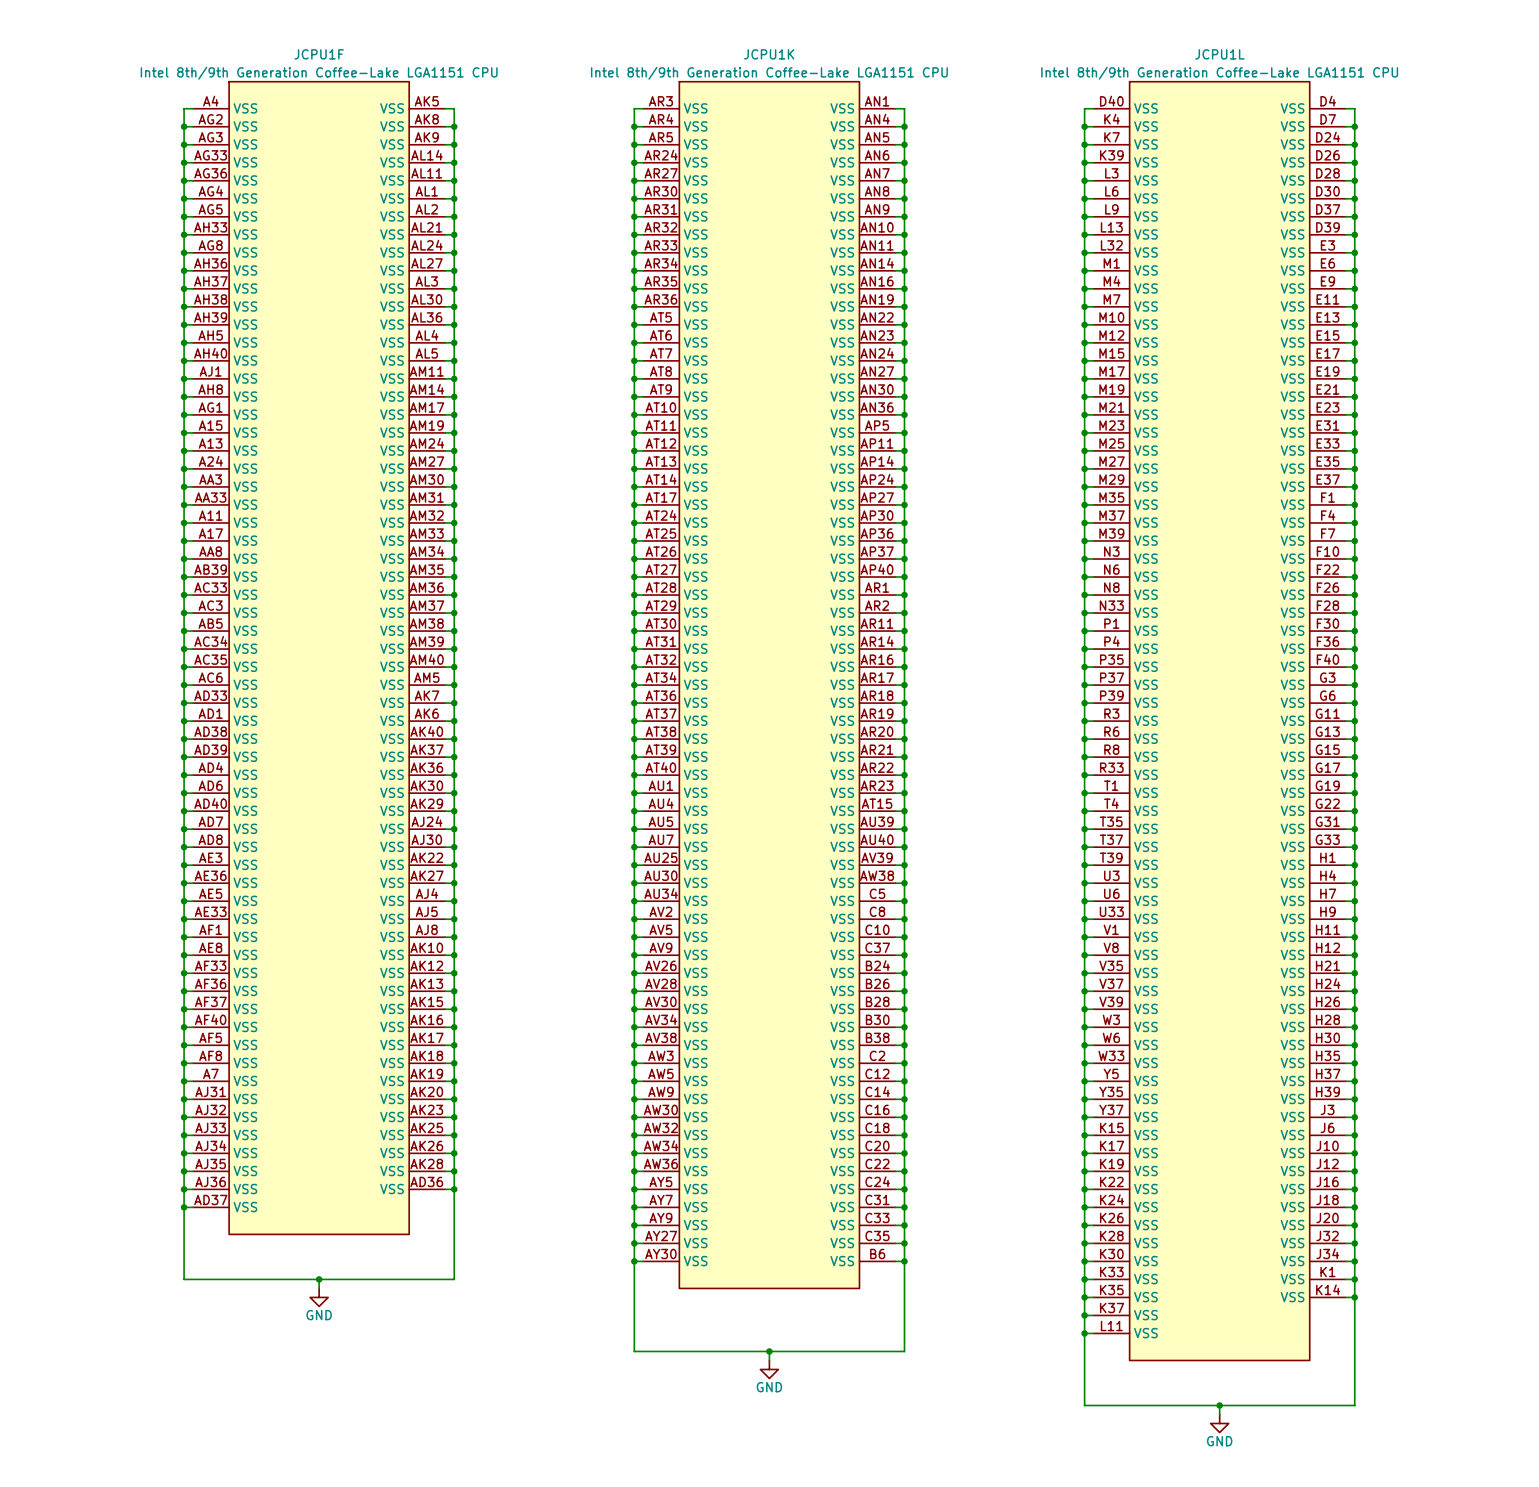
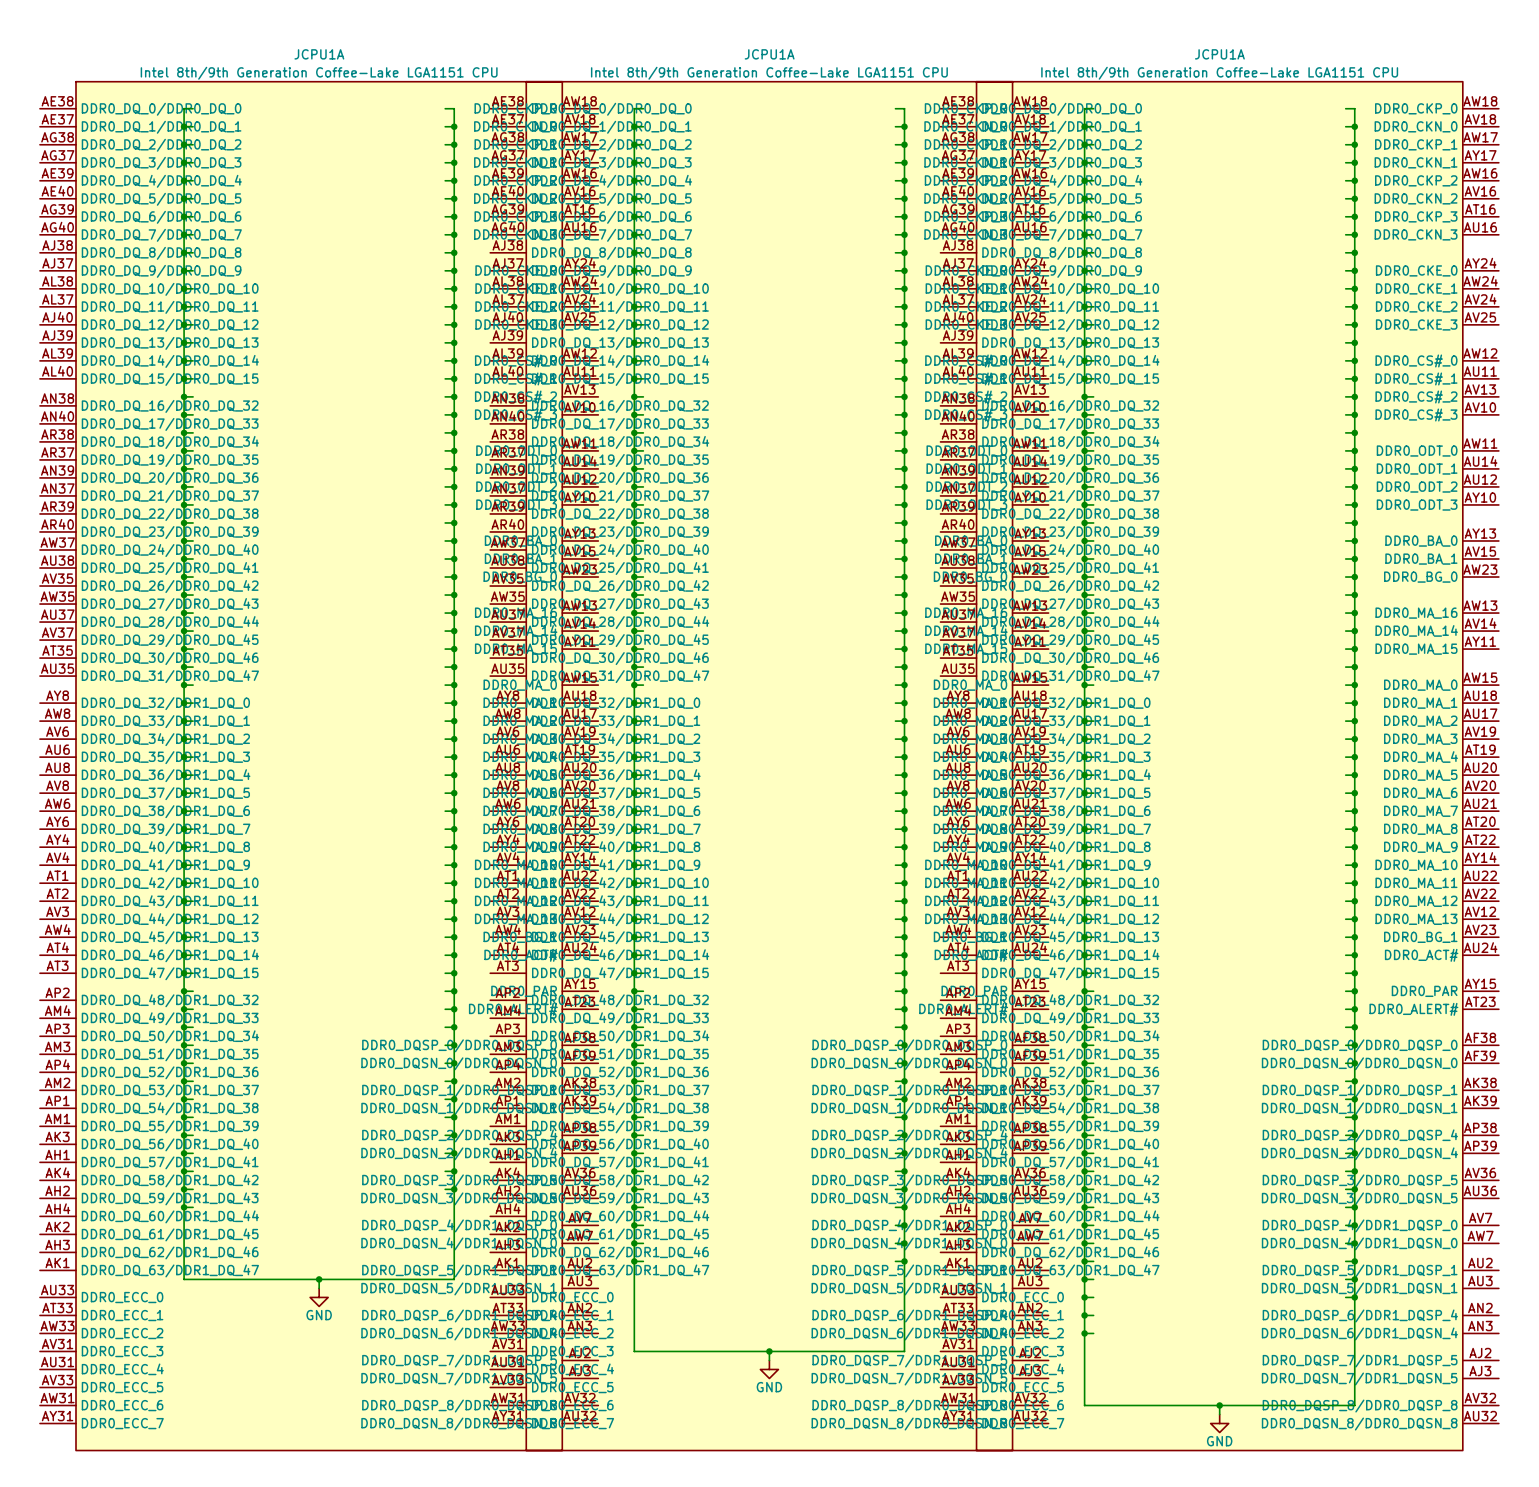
JCPU1F: Intel 8th/9th Generation Coffee-Lake LGA1151 CPU (319, 658) -> none
JCPU1K: Intel 8th/9th Generation Coffee-Lake LGA1151 CPU (769, 685) -> none
JCPU1L: Intel 8th/9th Generation Coffee-Lake LGA1151 CPU (1219, 721) -> none
JCPU1A: none -> Intel 8th/9th Generation Coffee-Lake LGA1151 CPU (319, 766)
JCPU1A: none -> Intel 8th/9th Generation Coffee-Lake LGA1151 CPU (769, 766)
JCPU1A: none -> Intel 8th/9th Generation Coffee-Lake LGA1151 CPU (1219, 766)

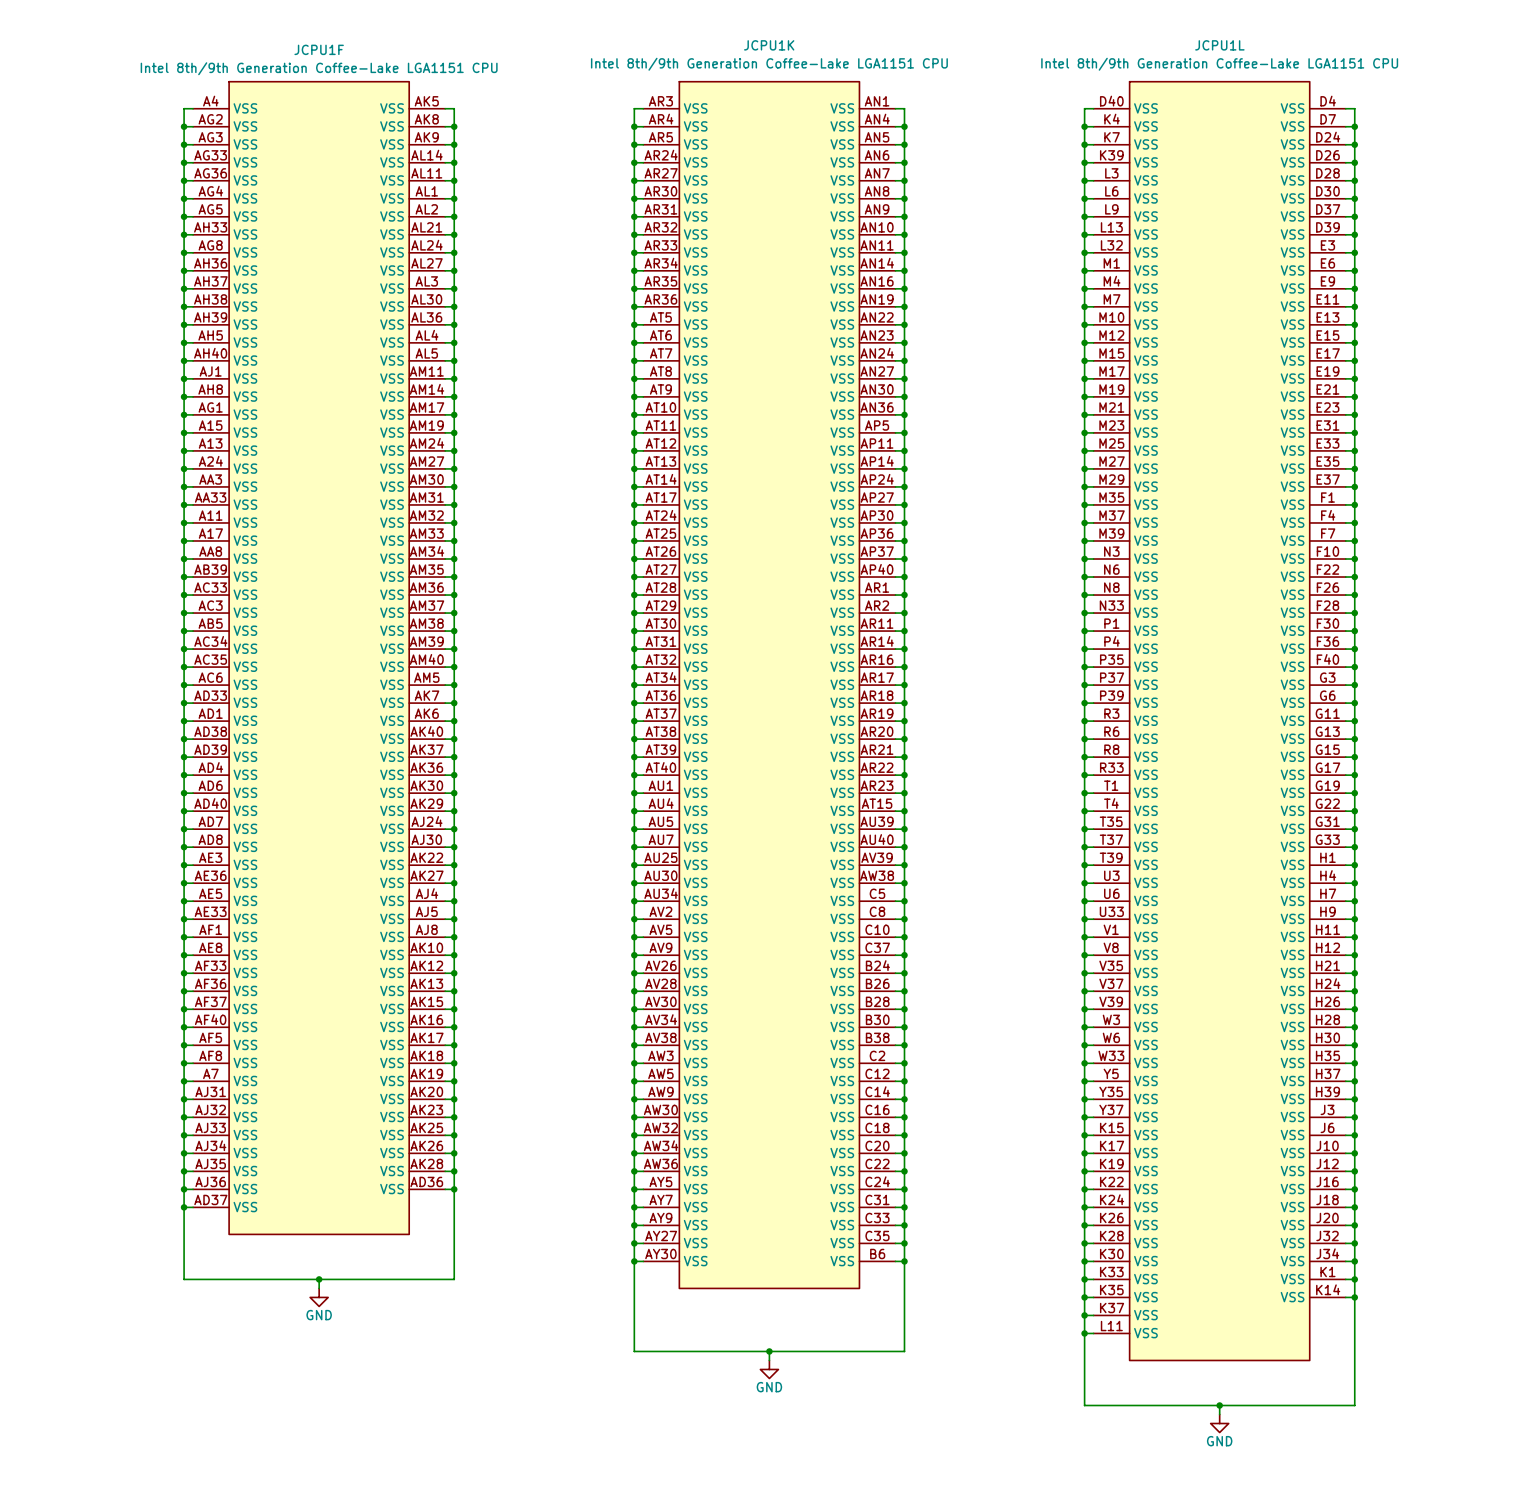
JCPU1F: none -> Intel 8th/9th Generation Coffee-Lake LGA1151 CPU (319, 658)
JCPU1K: none -> Intel 8th/9th Generation Coffee-Lake LGA1151 CPU (769, 685)
JCPU1L: none -> Intel 8th/9th Generation Coffee-Lake LGA1151 CPU (1219, 721)
JCPU1A: Intel 8th/9th Generation Coffee-Lake LGA1151 CPU (319, 766) -> none
JCPU1A: Intel 8th/9th Generation Coffee-Lake LGA1151 CPU (769, 766) -> none
JCPU1A: Intel 8th/9th Generation Coffee-Lake LGA1151 CPU (1219, 766) -> none

